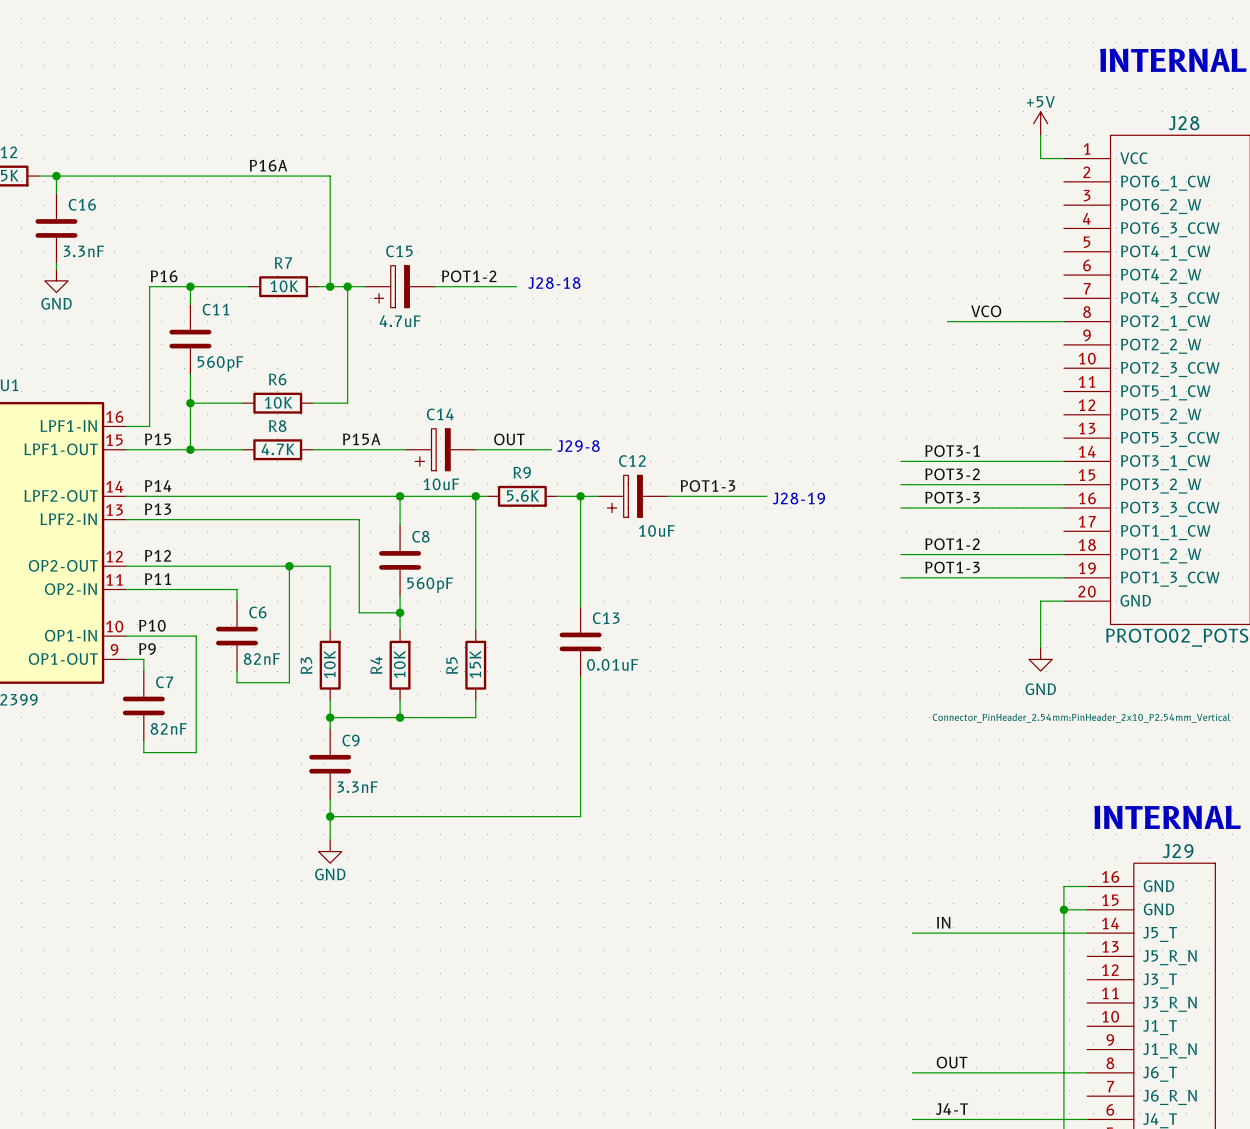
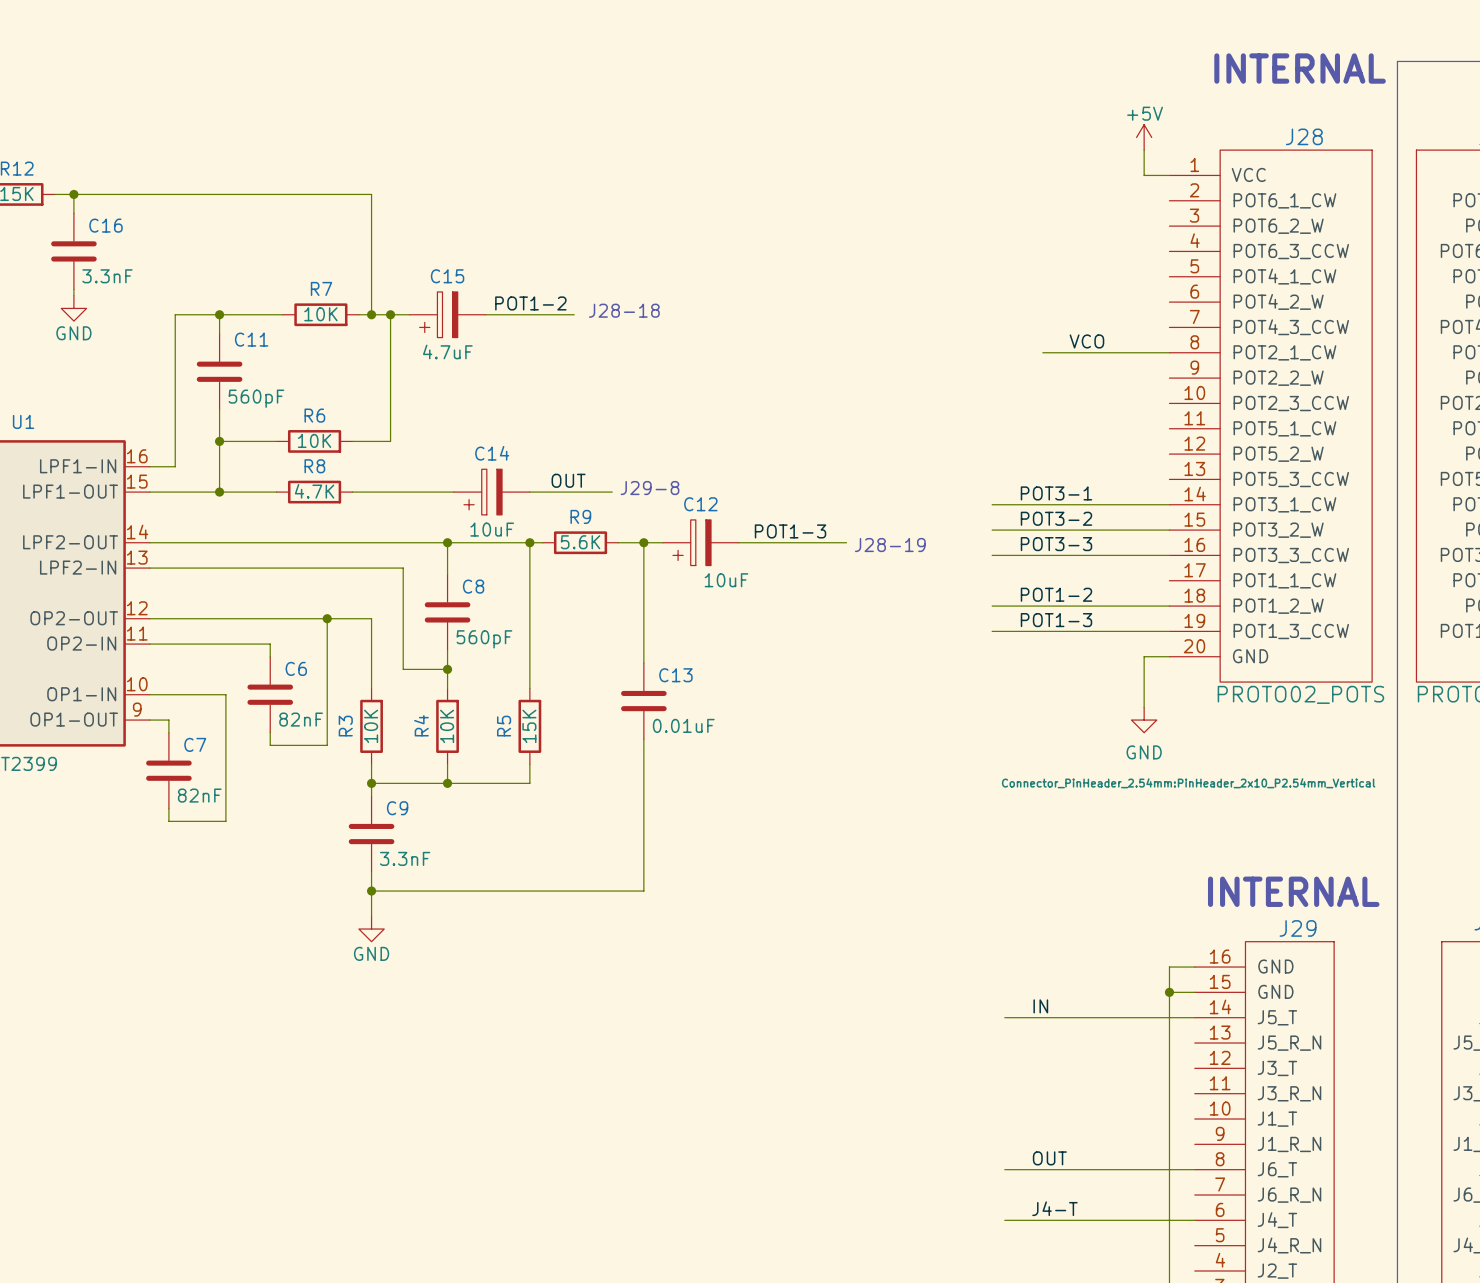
label: P16A (268, 165) -> none
label: P16 (164, 276) -> none
label: P15 (158, 439) -> none
label: P15A (361, 439) -> none
label: P14 (158, 485) -> none
label: P13 (158, 509) -> none
label: P12 (158, 555) -> none
label: P11 (158, 579) -> none
label: P10 (152, 625) -> none
label: P9 (147, 649) -> none

